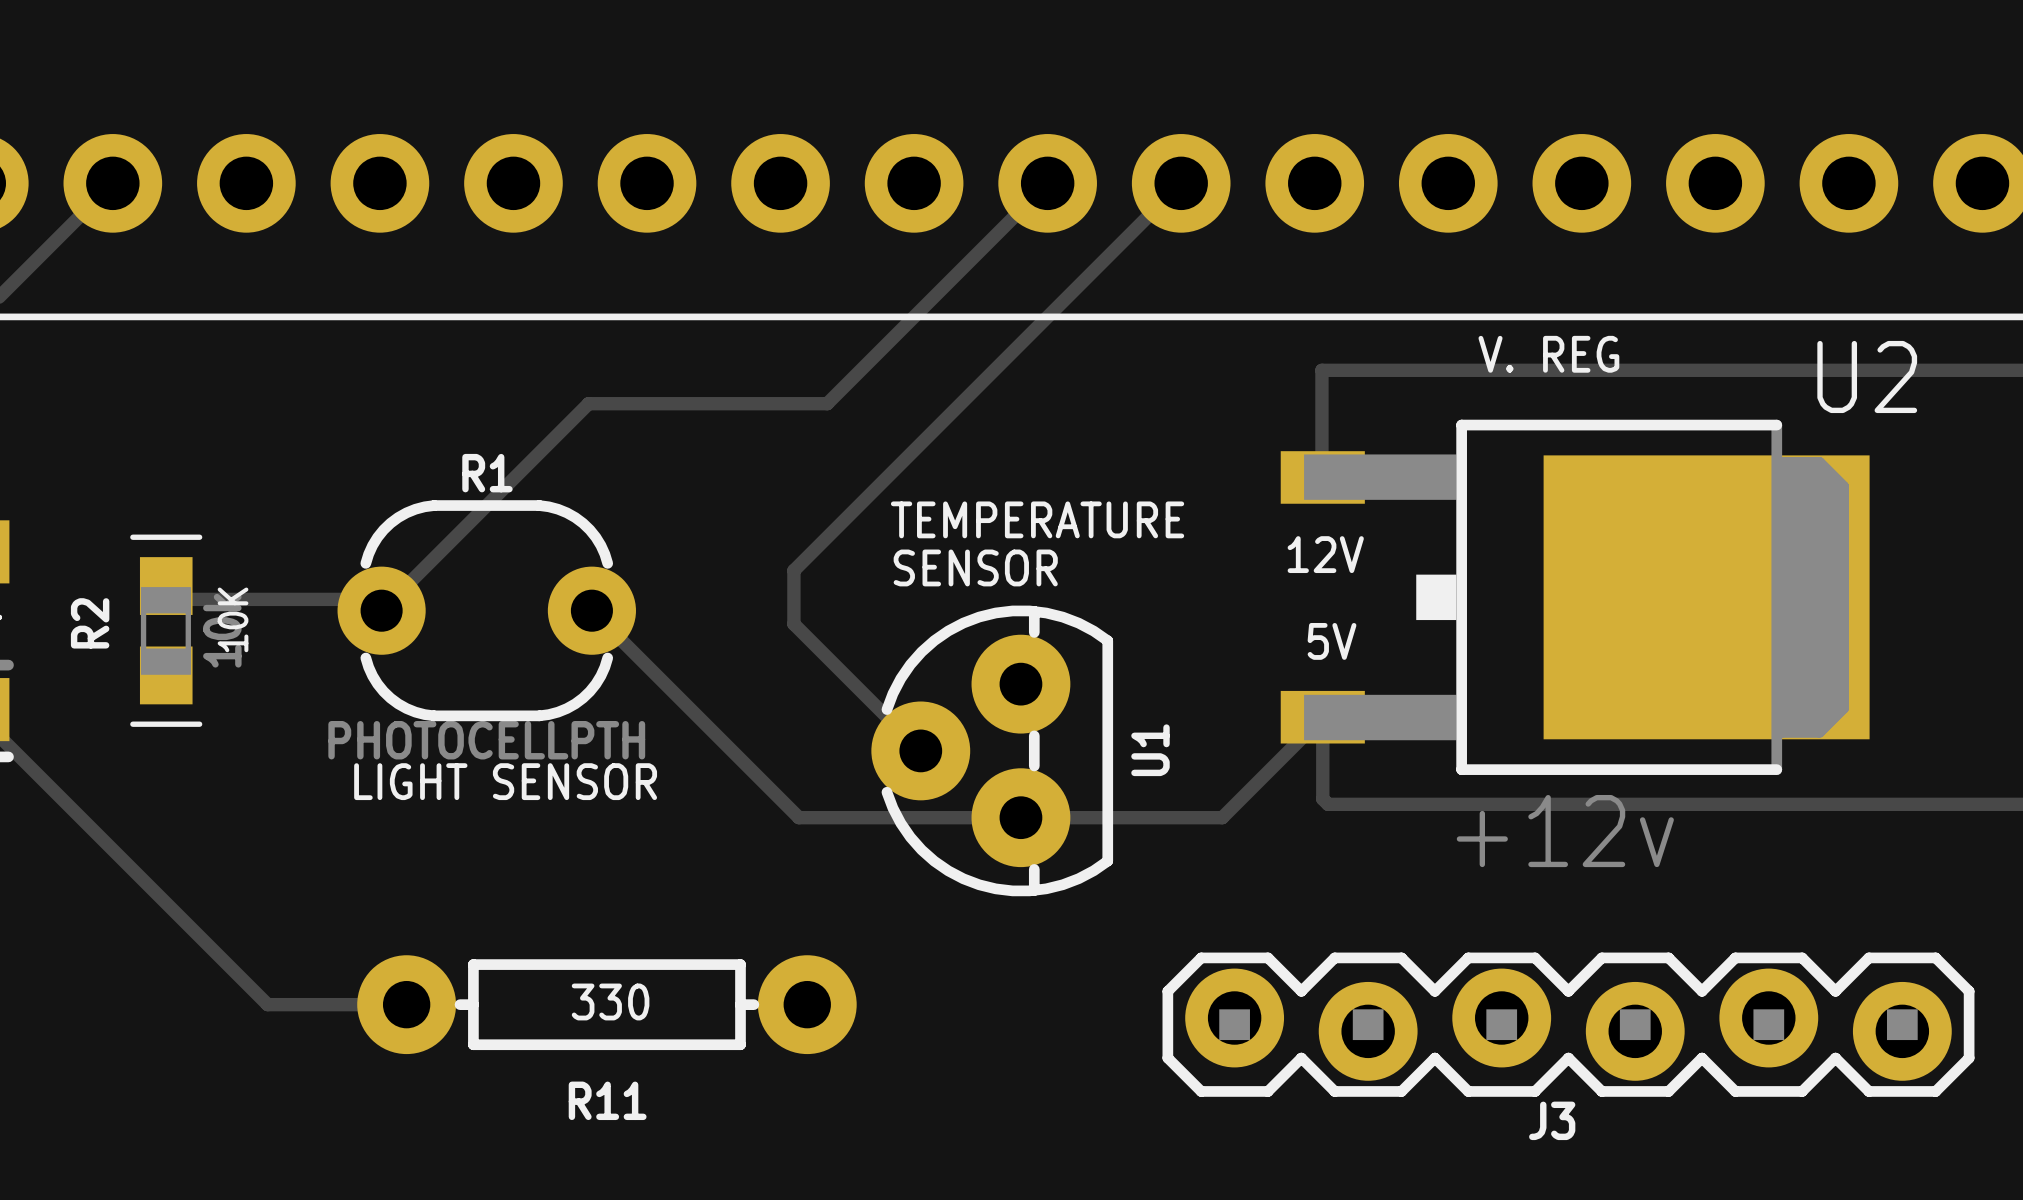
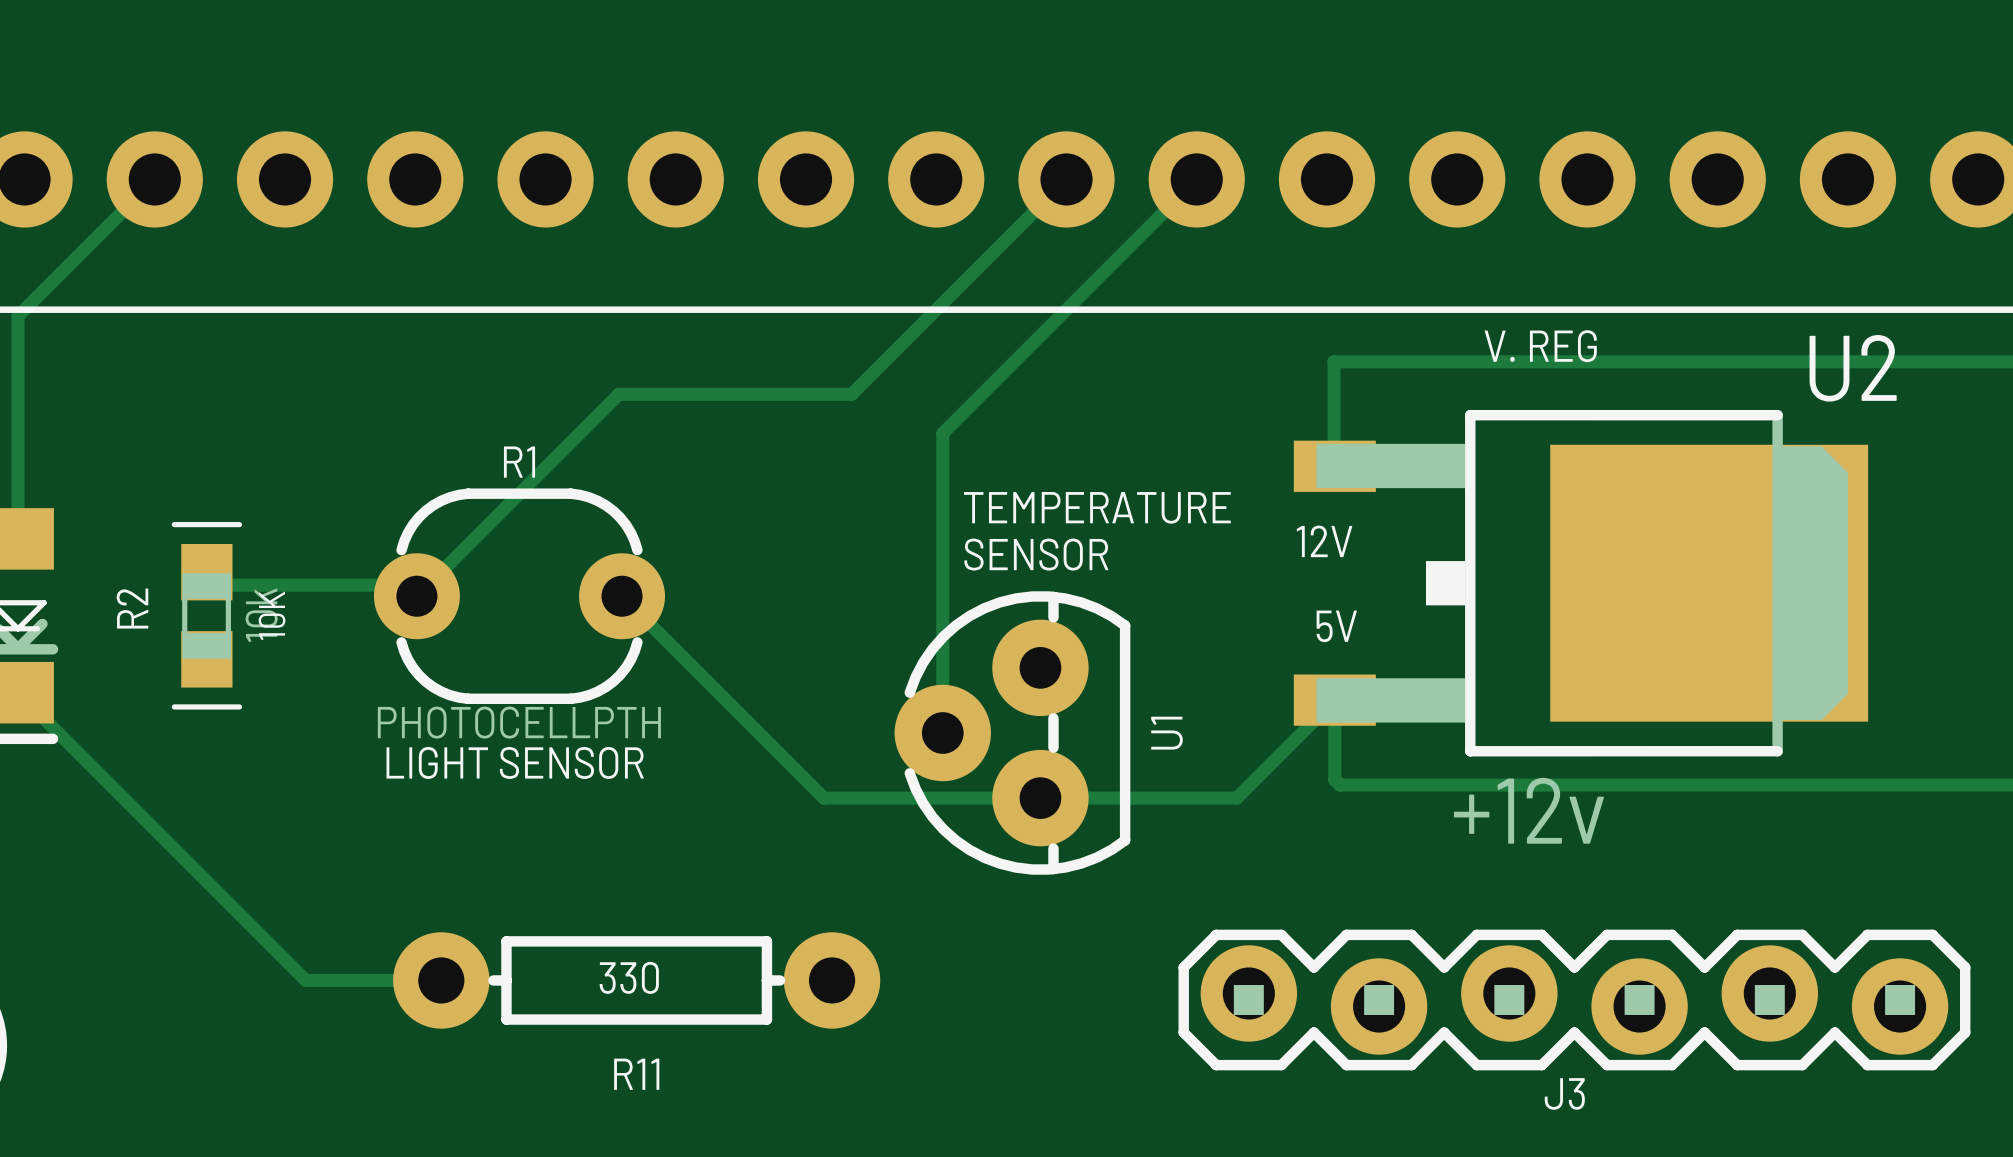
track: (920, 443) (793, 570) (793, 624) (920, 750) -> (942, 433) (942, 732)
text position: TEMPERATURE (1037, 519) -> TEMPERATURE (1097, 507)
text position: SENSOR (975, 567) -> SENSOR (1036, 554)

